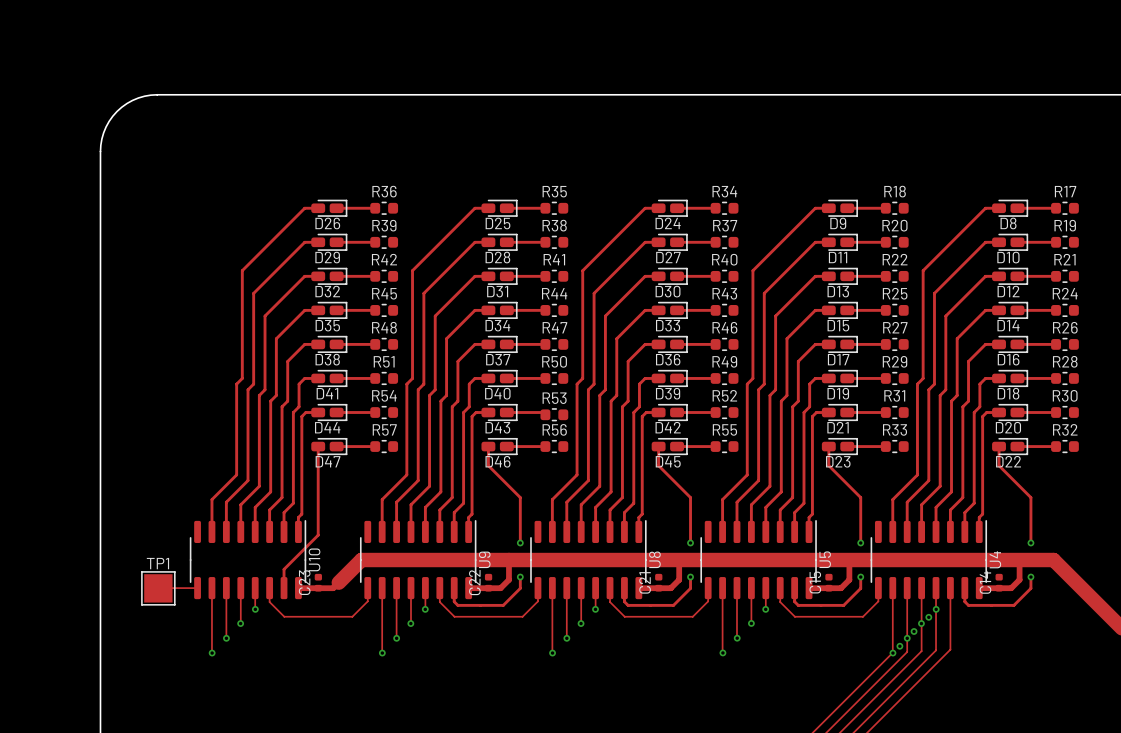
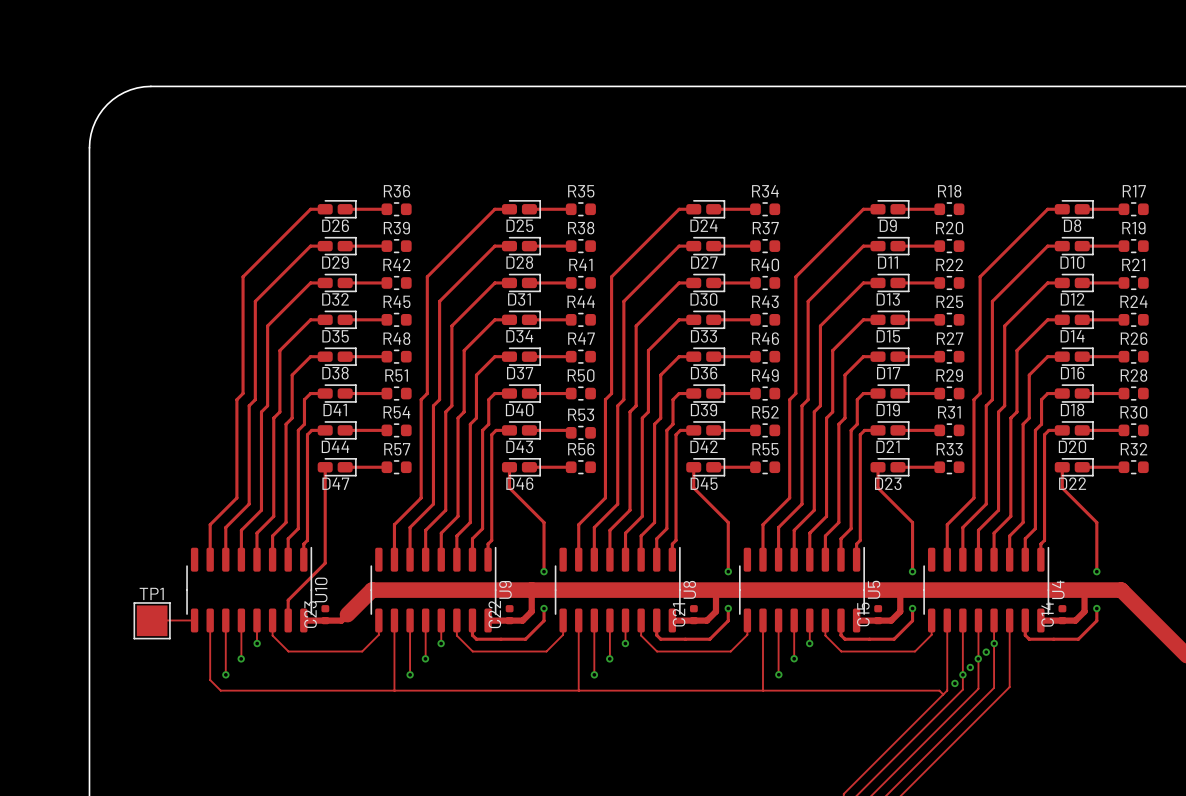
track: (211, 643) (212, 653) -> (210, 680) (220, 690) (939, 690) (943, 694)
via: (722, 652) -> none
via: (212, 653) -> none
via: (382, 653) -> none
via: (552, 653) -> none
via: (892, 653) -> none

